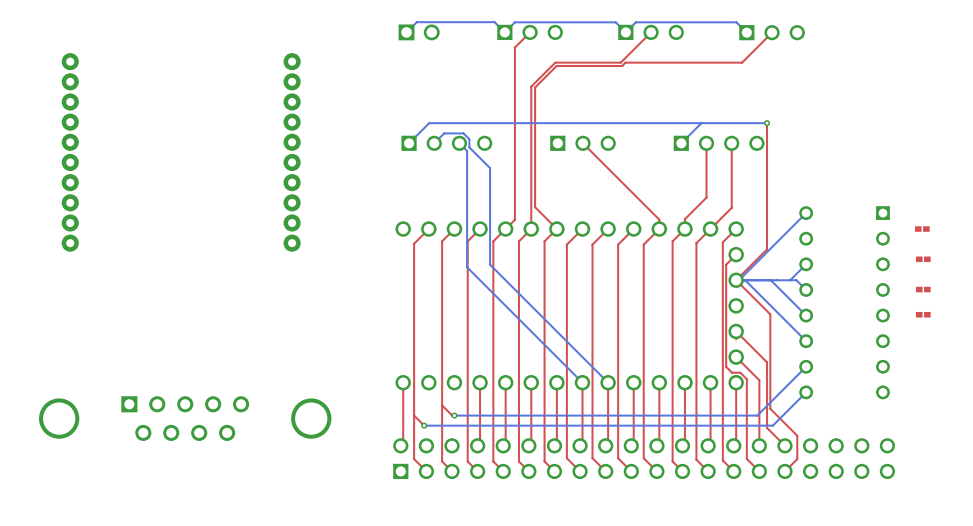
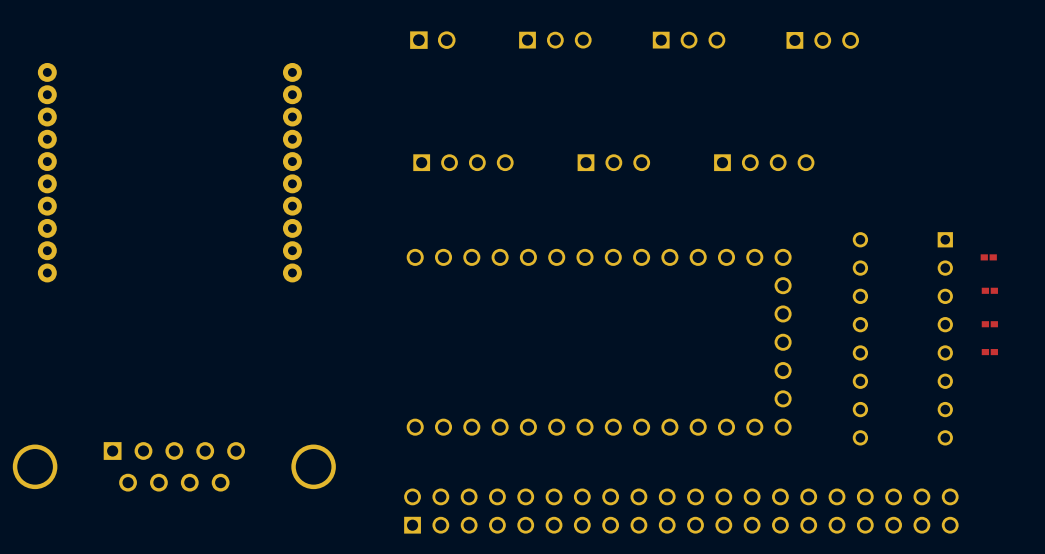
bottom track: (406, 32) (416, 22) (494, 22) (504, 32) (514, 22) (615, 22) (625, 32) (635, 22) (736, 22) (746, 32) -> none
top track: (530, 32) (514, 47) (514, 219) (493, 241) (493, 461) (503, 471) -> none
top track: (651, 32) (620, 62) (555, 62) (531, 86) (531, 229) (518, 241) (518, 461) (528, 471) -> none
top track: (772, 32) (742, 62) (625, 62) (622, 65) (556, 65) (535, 87) (535, 207) (556, 229) (544, 241) (544, 461) (554, 471) -> none
bottom track: (701, 123) (681, 143) -> none
top track: (767, 123) (767, 249) (736, 280) (770, 314) (770, 408) (797, 435) (797, 459) (784, 471) -> none
bottom track: (767, 123) (429, 123) (409, 143) -> none
via: (767, 123) -> none
bottom track: (434, 143) (444, 133) (463, 133) (469, 139) (469, 147) (490, 168) (490, 264) (608, 382) -> none
bottom track: (459, 143) (467, 150) (467, 267) (582, 382) -> none
top track: (583, 143) (659, 219) (659, 229) (643, 244) (643, 458) (656, 471) -> none
top track: (706, 143) (706, 197) (684, 219) (684, 229) (672, 241) (672, 461) (682, 471) -> none
top track: (731, 143) (731, 207) (696, 243) (696, 459) (708, 471) -> none
bottom track: (806, 213) (738, 280) -> none
top track: (428, 229) (414, 243) (414, 459) (426, 471) -> none
top track: (454, 229) (442, 241) (442, 461) (452, 471) -> none
top track: (480, 229) (467, 241) (467, 461) (477, 471) -> none
top track: (582, 229) (566, 244) (566, 458) (580, 471) -> none
top track: (608, 229) (592, 244) (592, 458) (605, 471) -> none
top track: (633, 229) (618, 244) (618, 458) (631, 471) -> none
top track: (736, 229) (722, 242) (722, 460) (733, 471) -> none
top track: (736, 254) (726, 264) (726, 366) (732, 372) (740, 372) (746, 379) (746, 458) (759, 471) -> none
bottom track: (806, 264) (790, 280) -> none
bottom track: (736, 280) (796, 280) (806, 289) -> none
bottom track: (745, 280) (806, 341) -> none
bottom track: (770, 280) (806, 315) -> none
top track: (736, 339) (736, 331) (767, 362) (767, 427) (784, 445) -> none
top track: (736, 357) (759, 380) (759, 445) -> none
bottom track: (806, 366) (757, 415) (454, 415) -> none
top track: (403, 382) (403, 443) (400, 445) -> none
top track: (480, 382) (480, 443) (477, 445) -> none
top track: (505, 382) (505, 443) (503, 445) -> none
top track: (531, 382) (531, 443) (528, 445) -> none
top track: (556, 382) (556, 443) (554, 445) -> none
top track: (582, 382) (582, 443) (580, 445) -> none
top track: (608, 382) (608, 443) (605, 445) -> none
top track: (633, 382) (633, 443) (631, 445) -> none
top track: (659, 382) (659, 443) (656, 445) -> none
top track: (684, 382) (684, 443) (682, 445) -> none
top track: (710, 382) (710, 443) (708, 445) -> none
top track: (736, 382) (736, 443) (733, 445) -> none
bottom track: (806, 392) (772, 425) (424, 425) -> none
top track: (442, 405) (454, 415) -> none
top track: (414, 415) (424, 425) -> none
via: (454, 415) -> none
via: (424, 425) -> none

